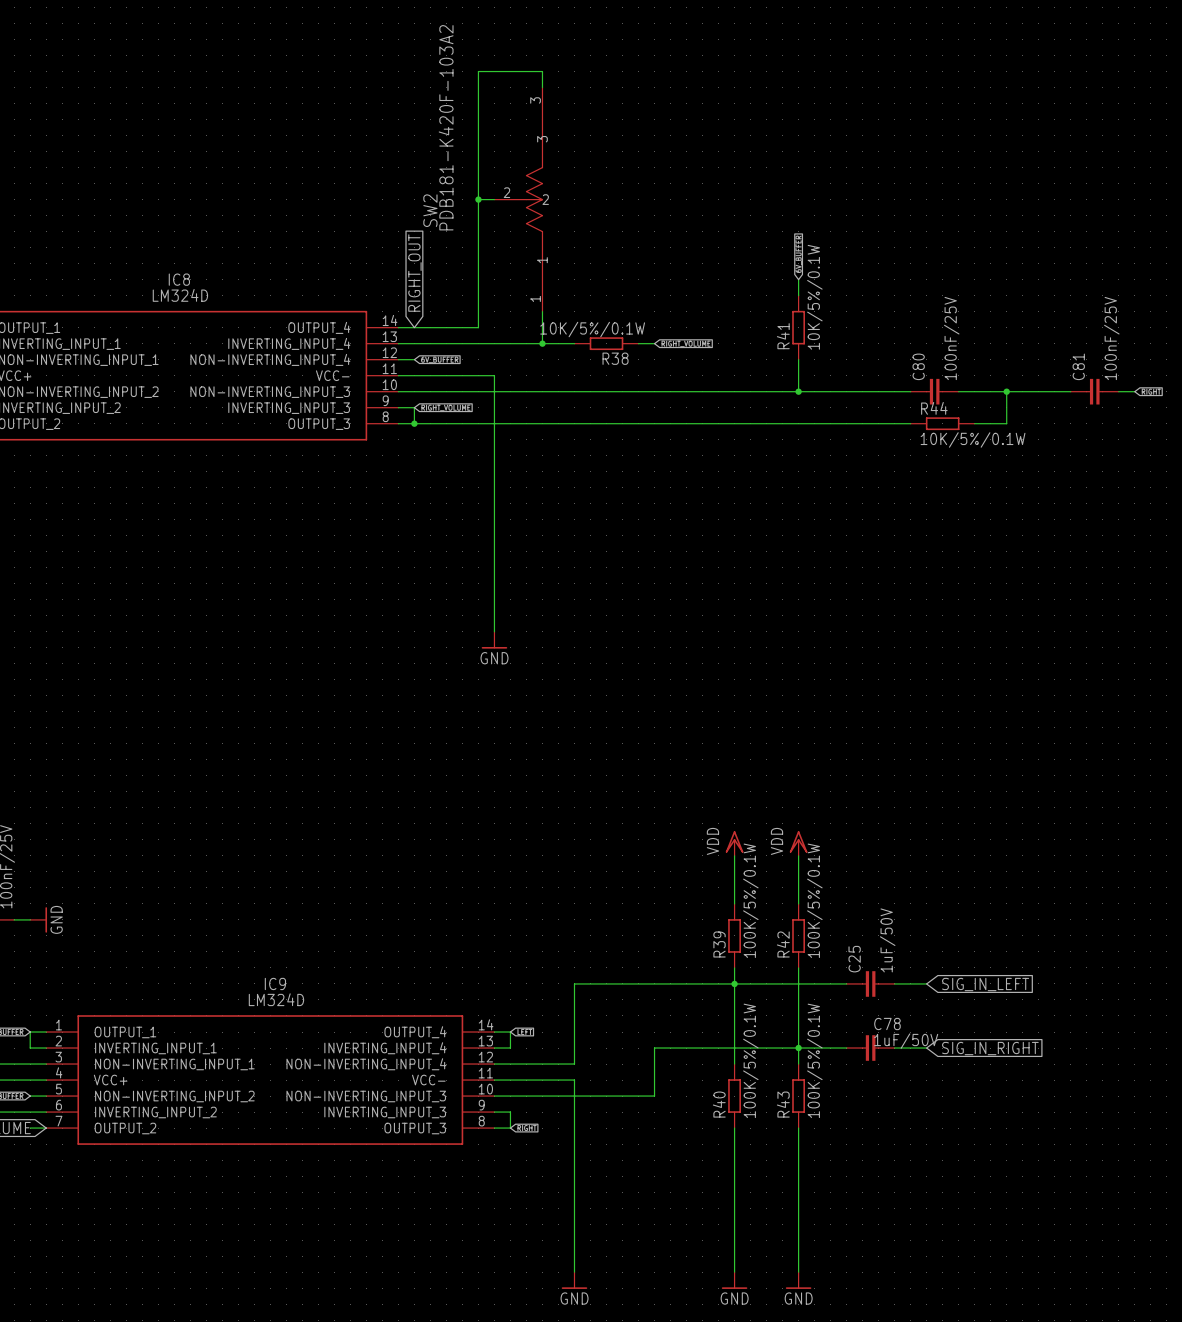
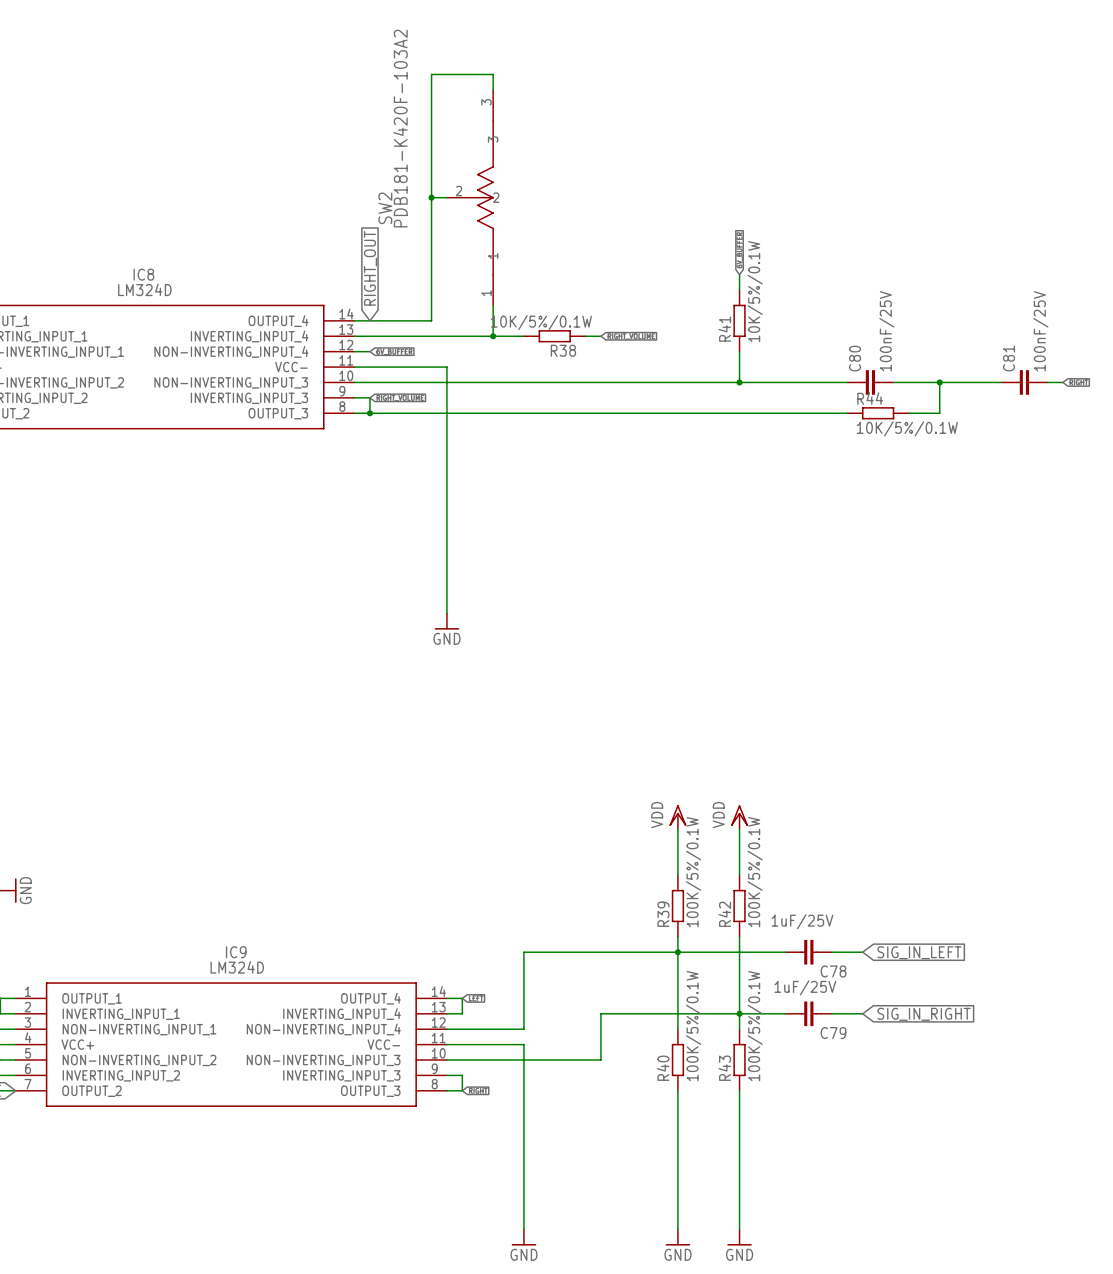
C25 value: 1uF/50V (887, 940) -> 1uF/25V (802, 921)
C25 name: C25 (854, 959) -> C78 (833, 971)
C78 name: C78 (887, 1024) -> C79 (833, 1033)
C78 value: 1uF/50V (906, 1041) -> 1uF/25V (805, 987)

